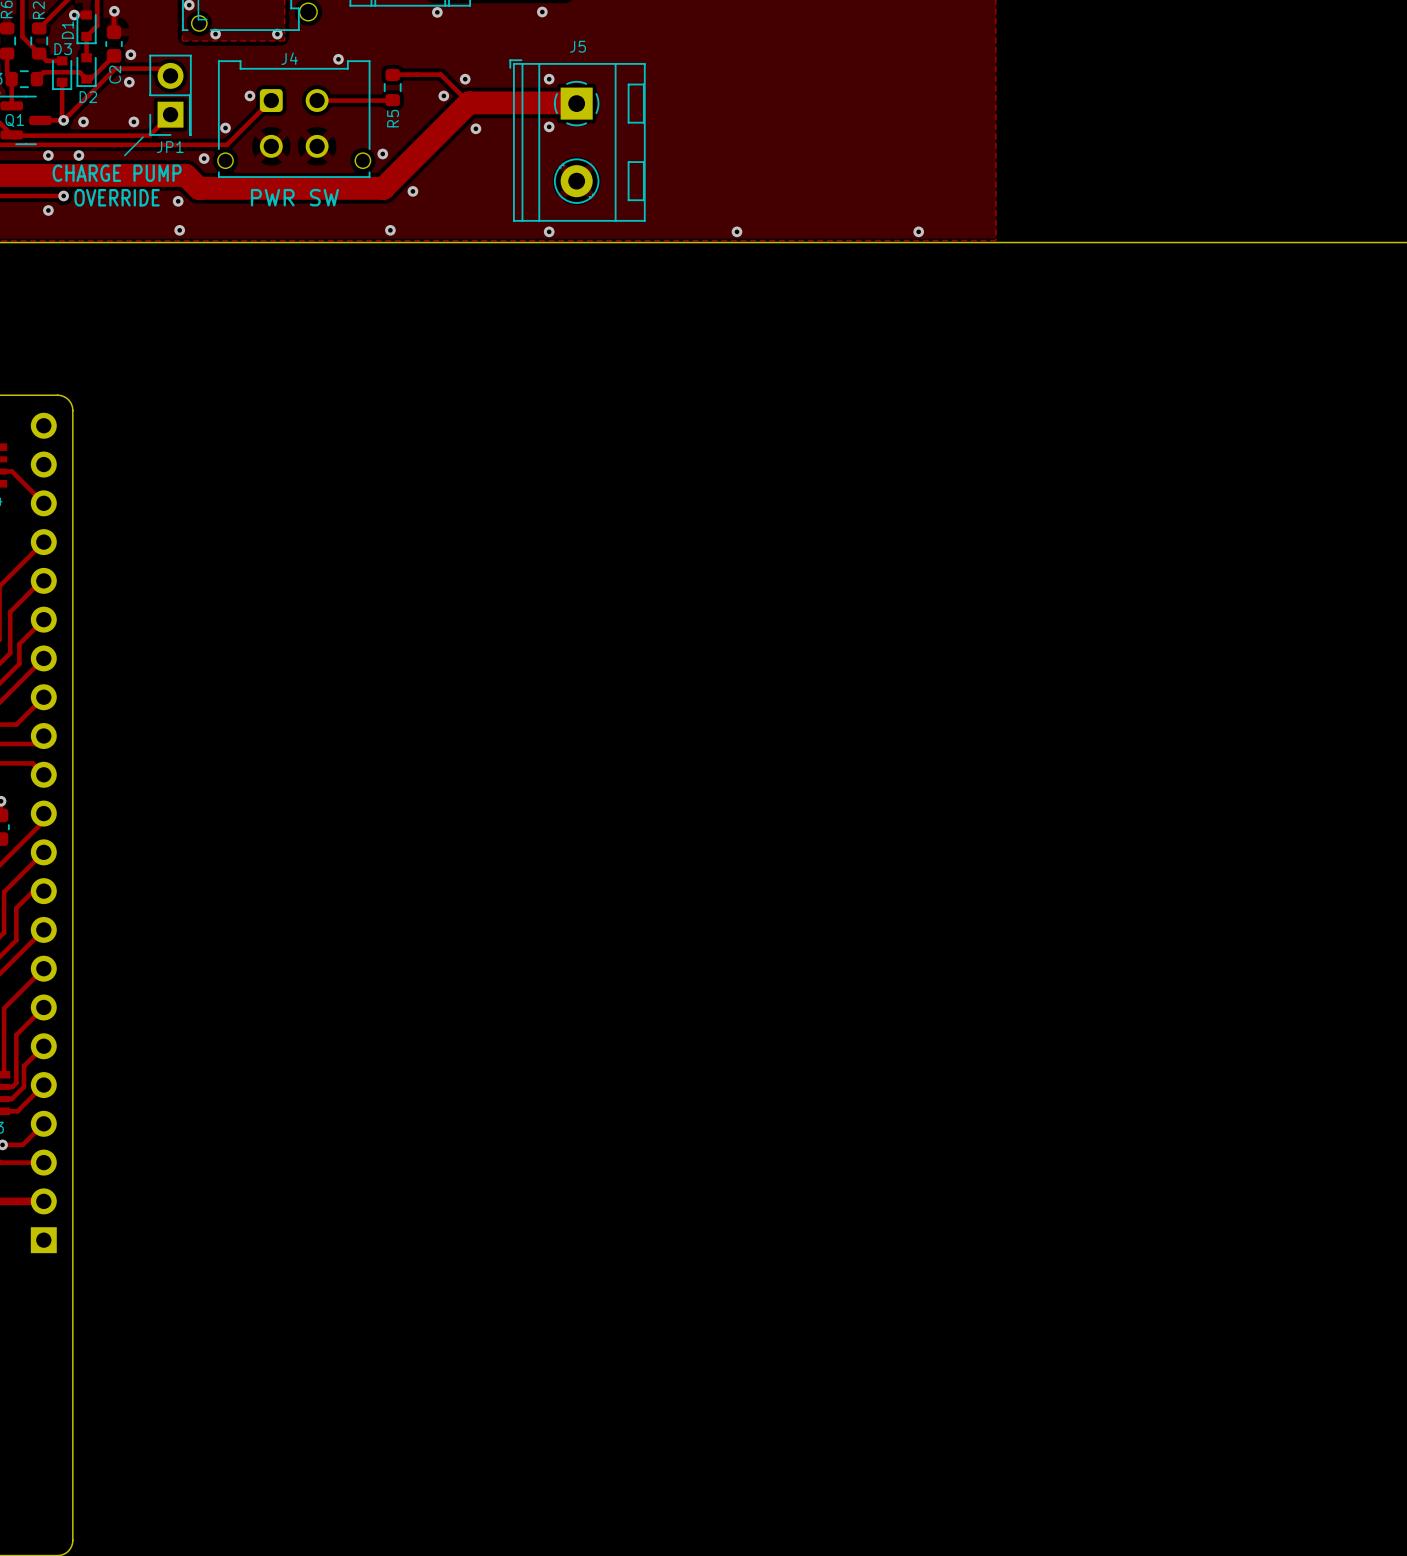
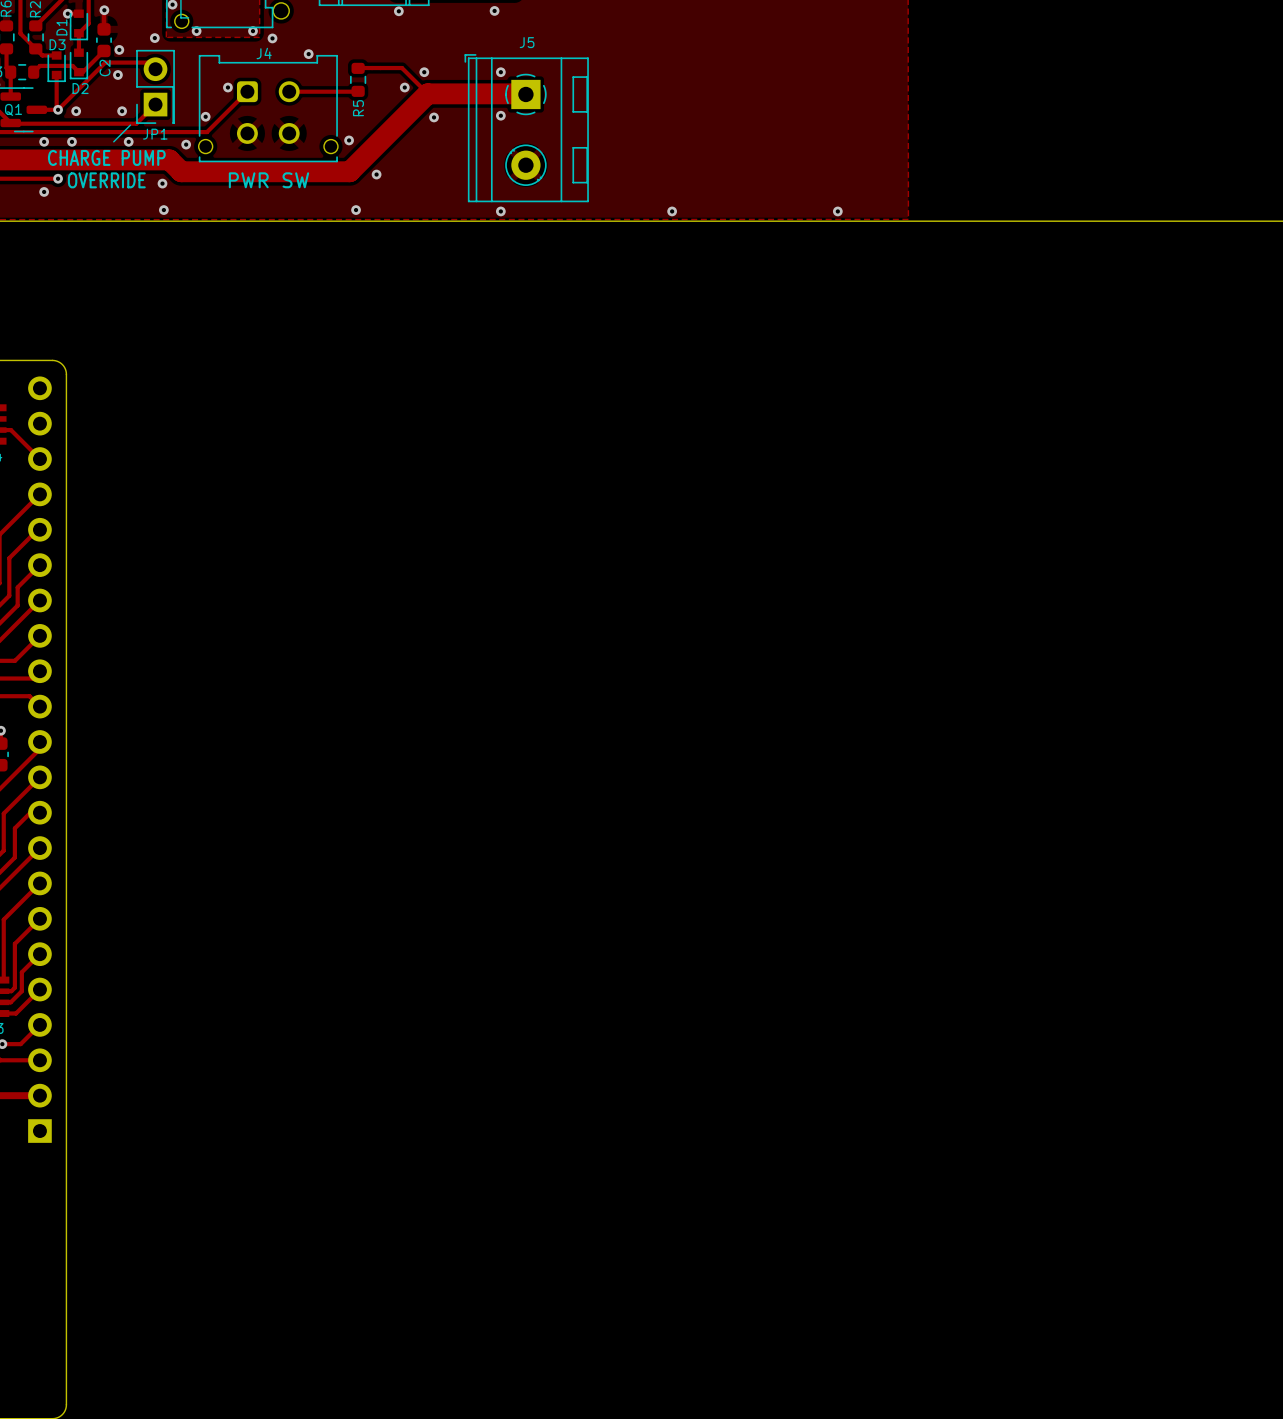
via: none -> (154, 38)
via: none -> (272, 38)
via: none -> (128, 141)

